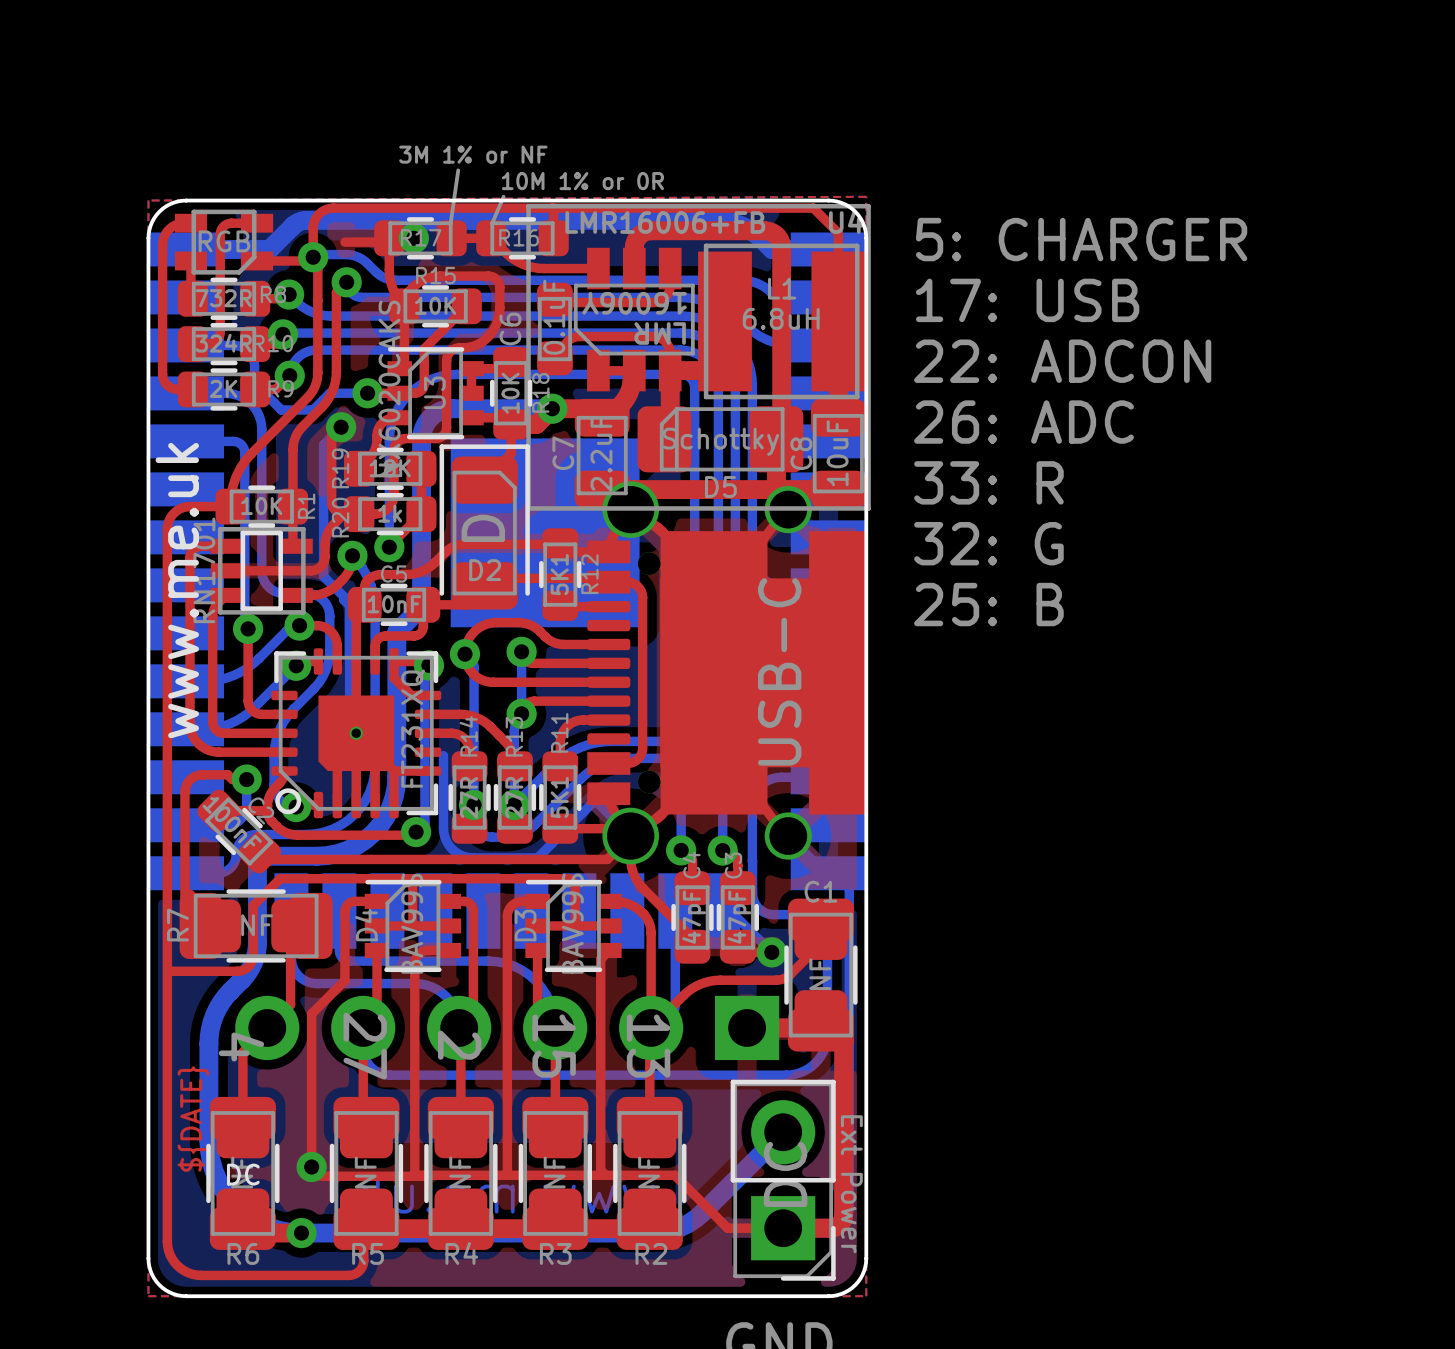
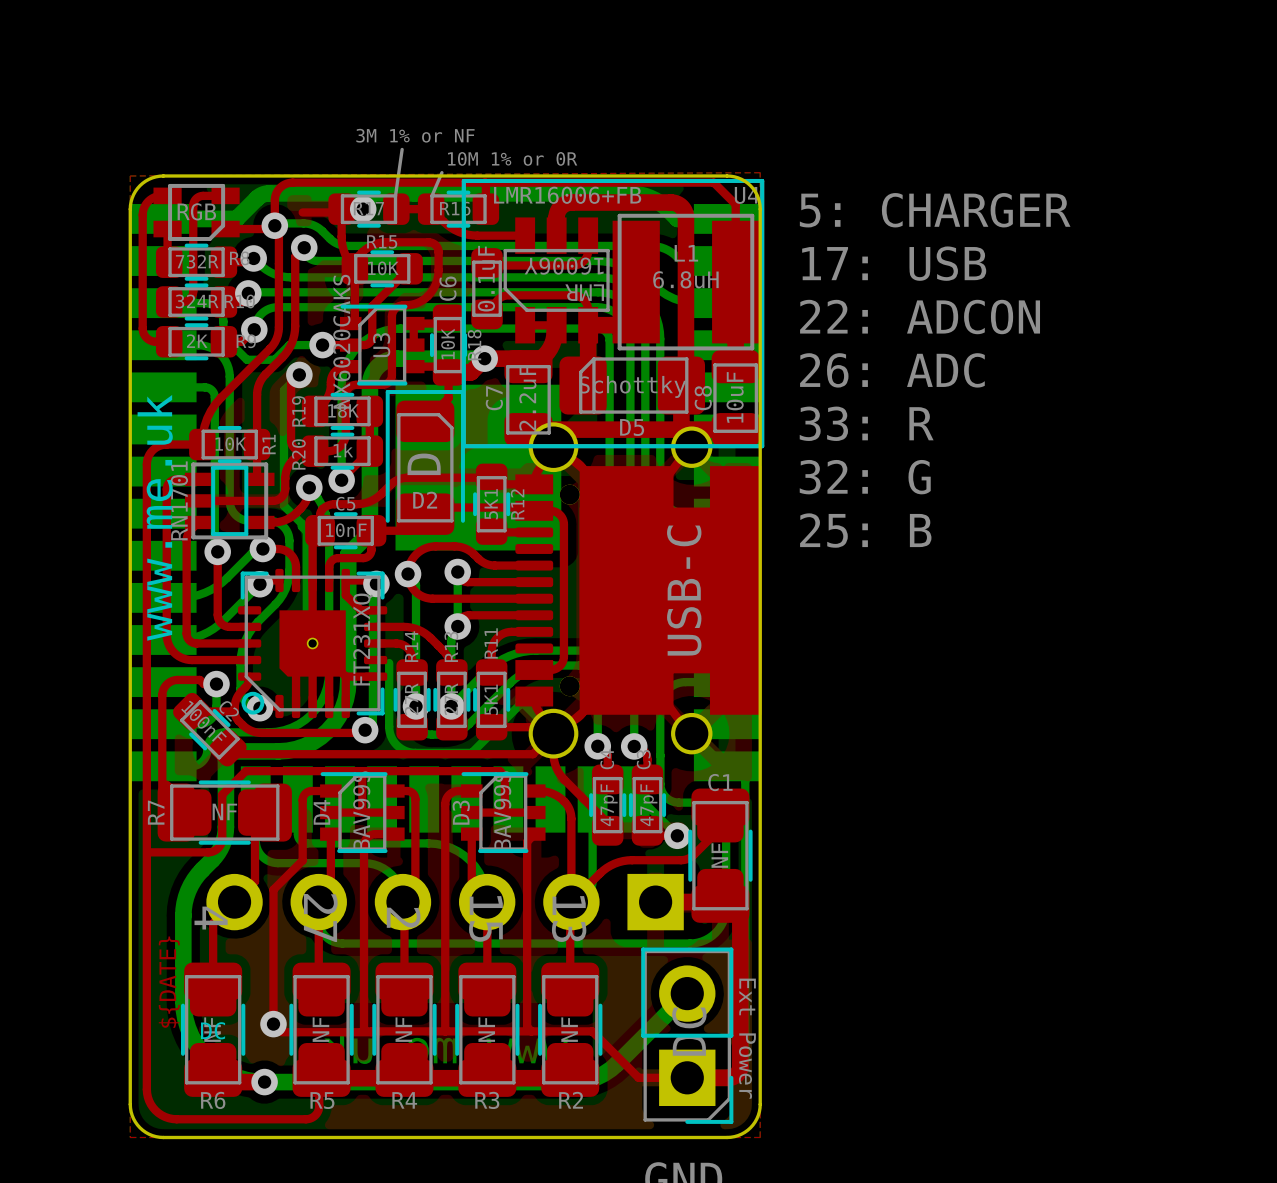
U4 footprint: [526, 203, 871, 511] -> [461, 178, 765, 449]

